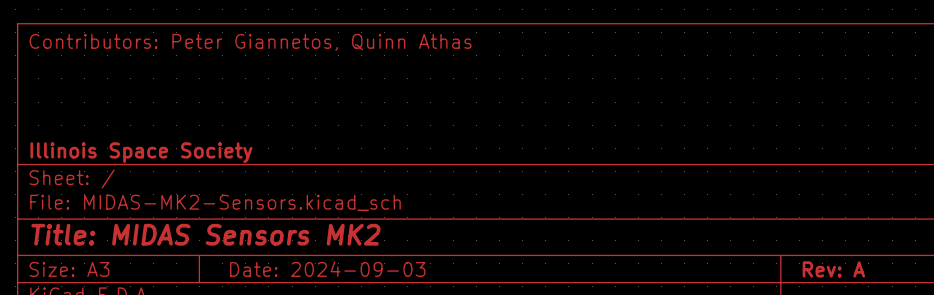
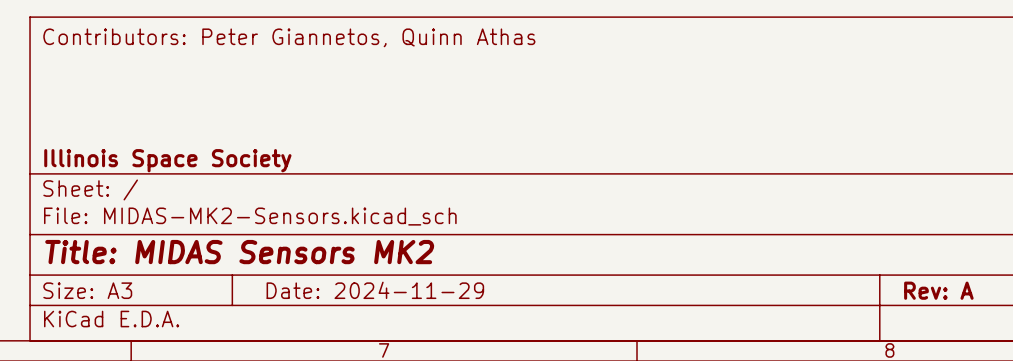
title block: Date: 2024-09-03 (327, 269) -> Date: 2024-11-29 (375, 290)

